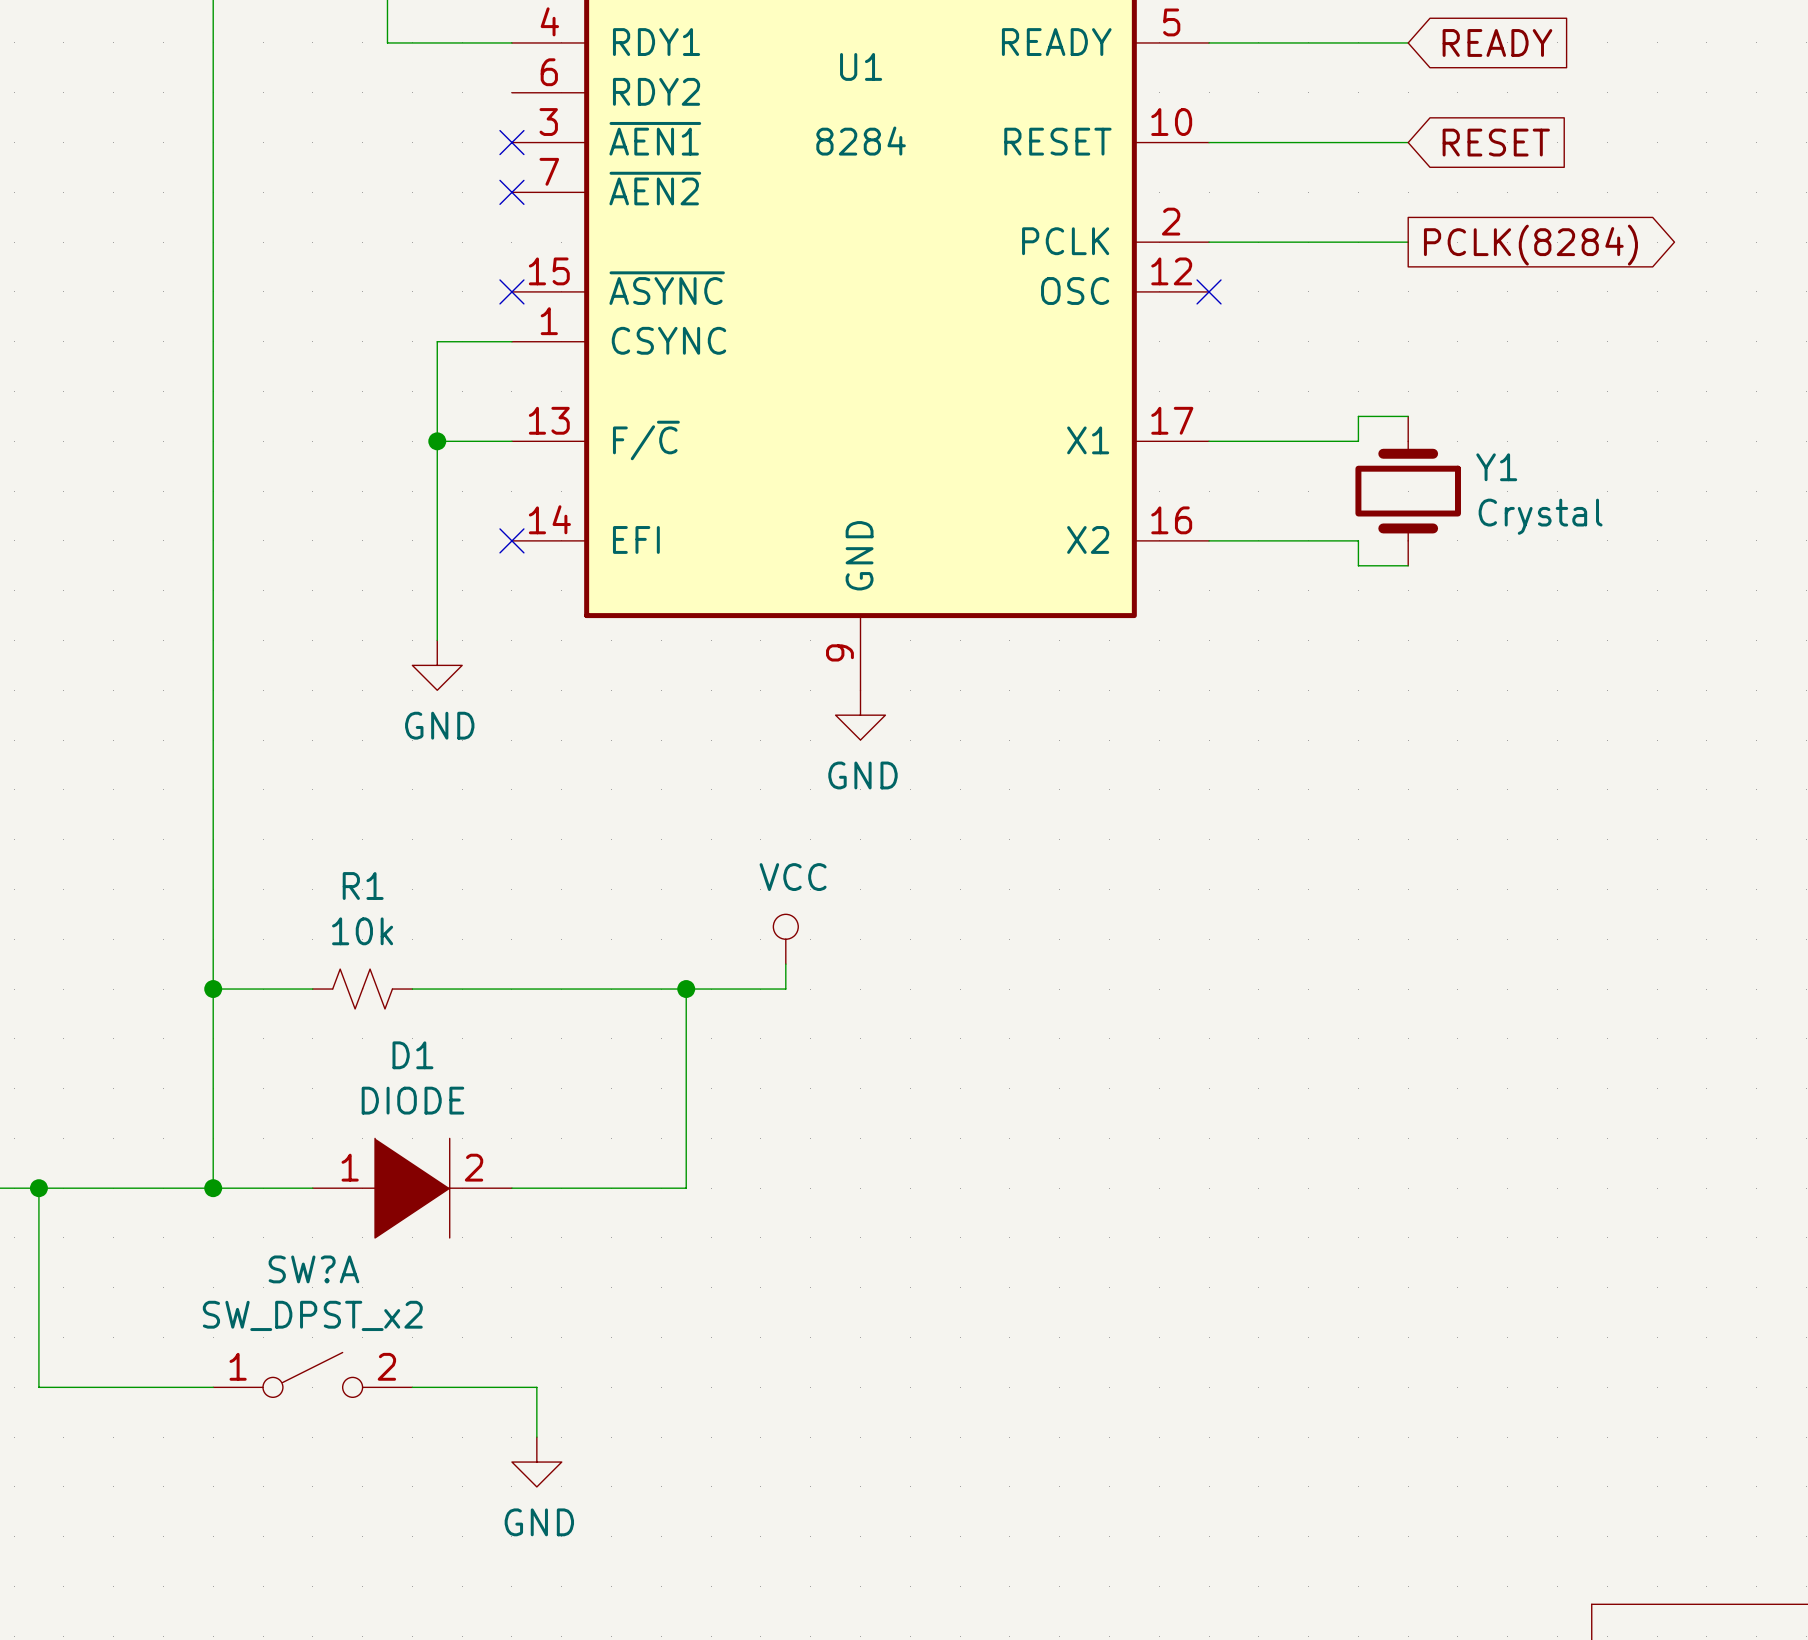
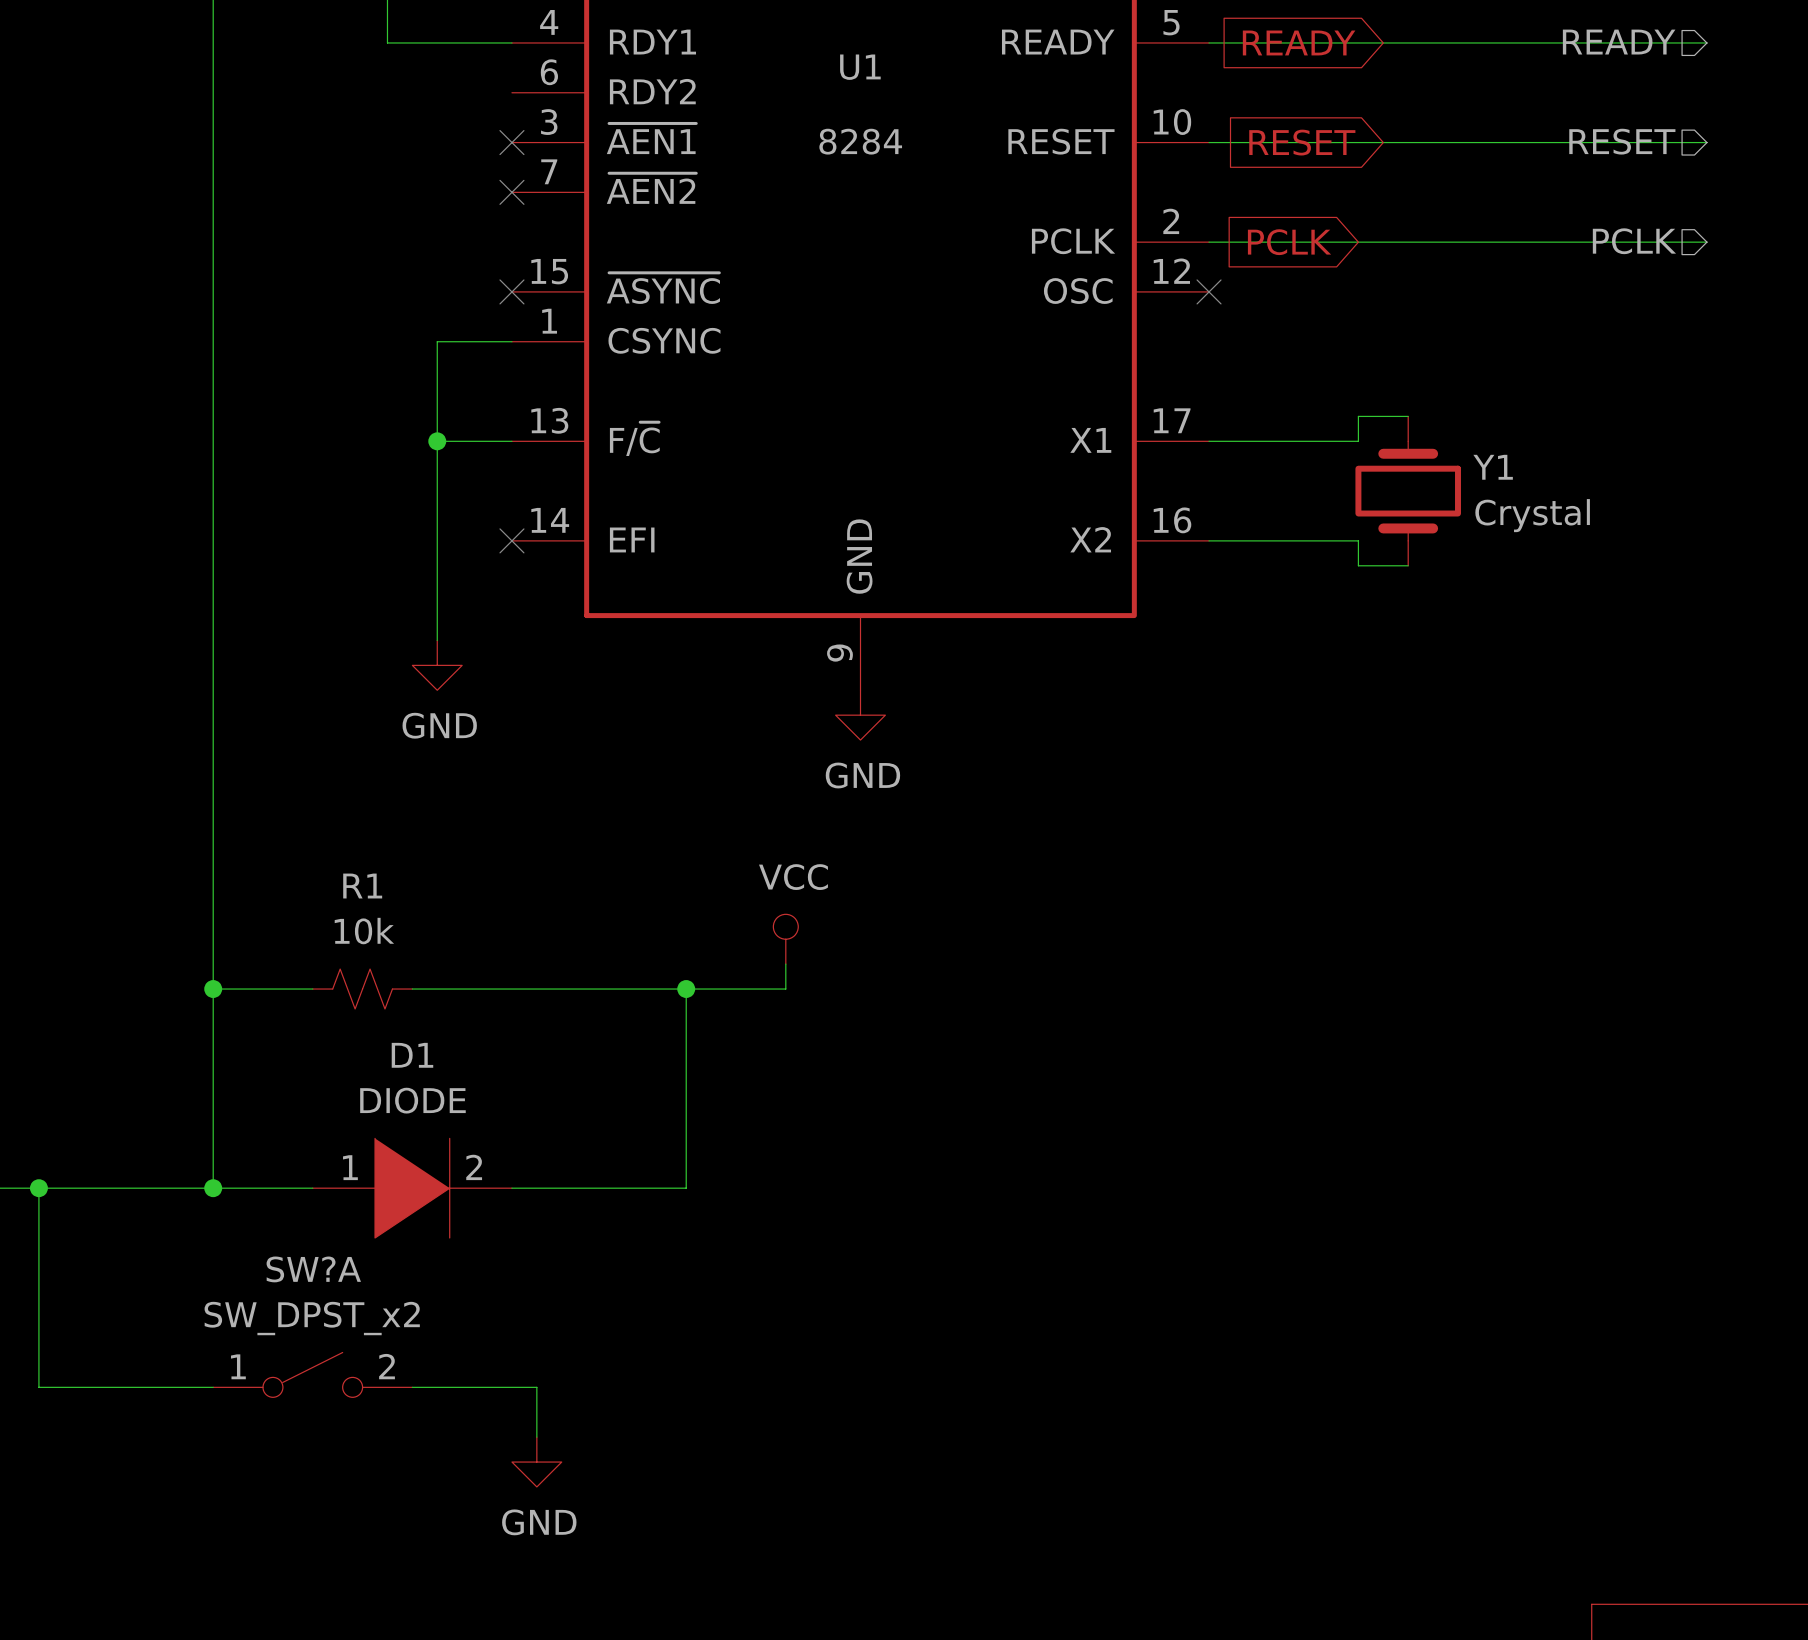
wire: none -> (1408, 42) (1706, 42)
global label rotation: 0° (1497, 42) -> 180° (1299, 42)
global label position: READY (1497, 42) -> READY (1299, 42)
hierarchical label: none -> READY (1619, 42)
hierarchical label: none -> RESET (1622, 141)
wire: none -> (1408, 142) (1706, 142)
global label rotation: 0° (1496, 142) -> 180° (1302, 142)
global label position: RESET (1496, 142) -> RESET (1302, 142)
hierarchical label: none -> PCLK (1634, 241)
global label: none -> PCLK (1289, 242)
wire: none -> (1408, 242) (1706, 242)
global label: PCLK(8284) (1530, 245) -> none

